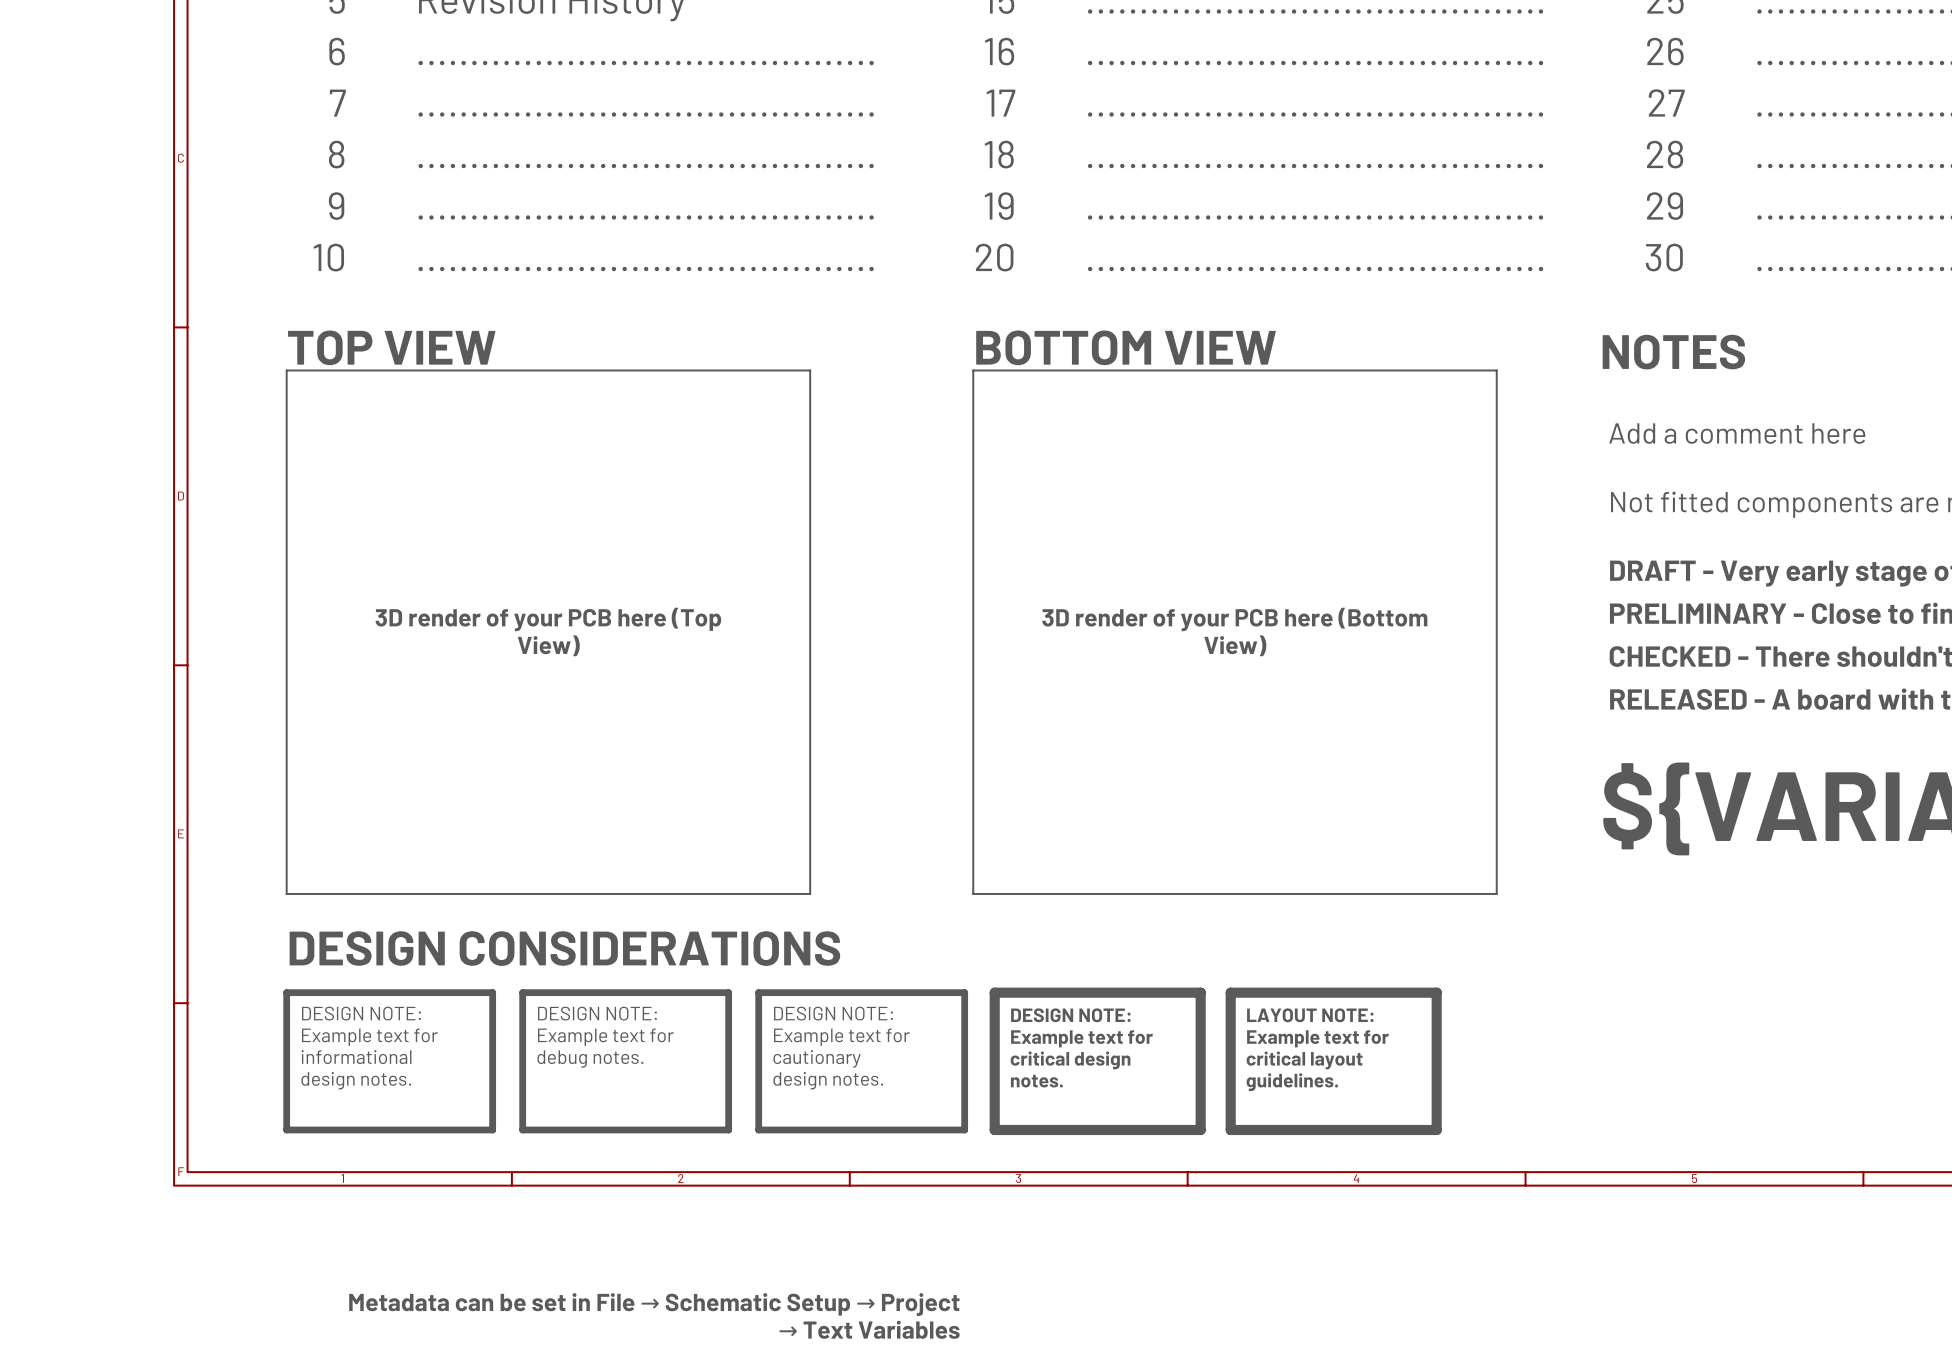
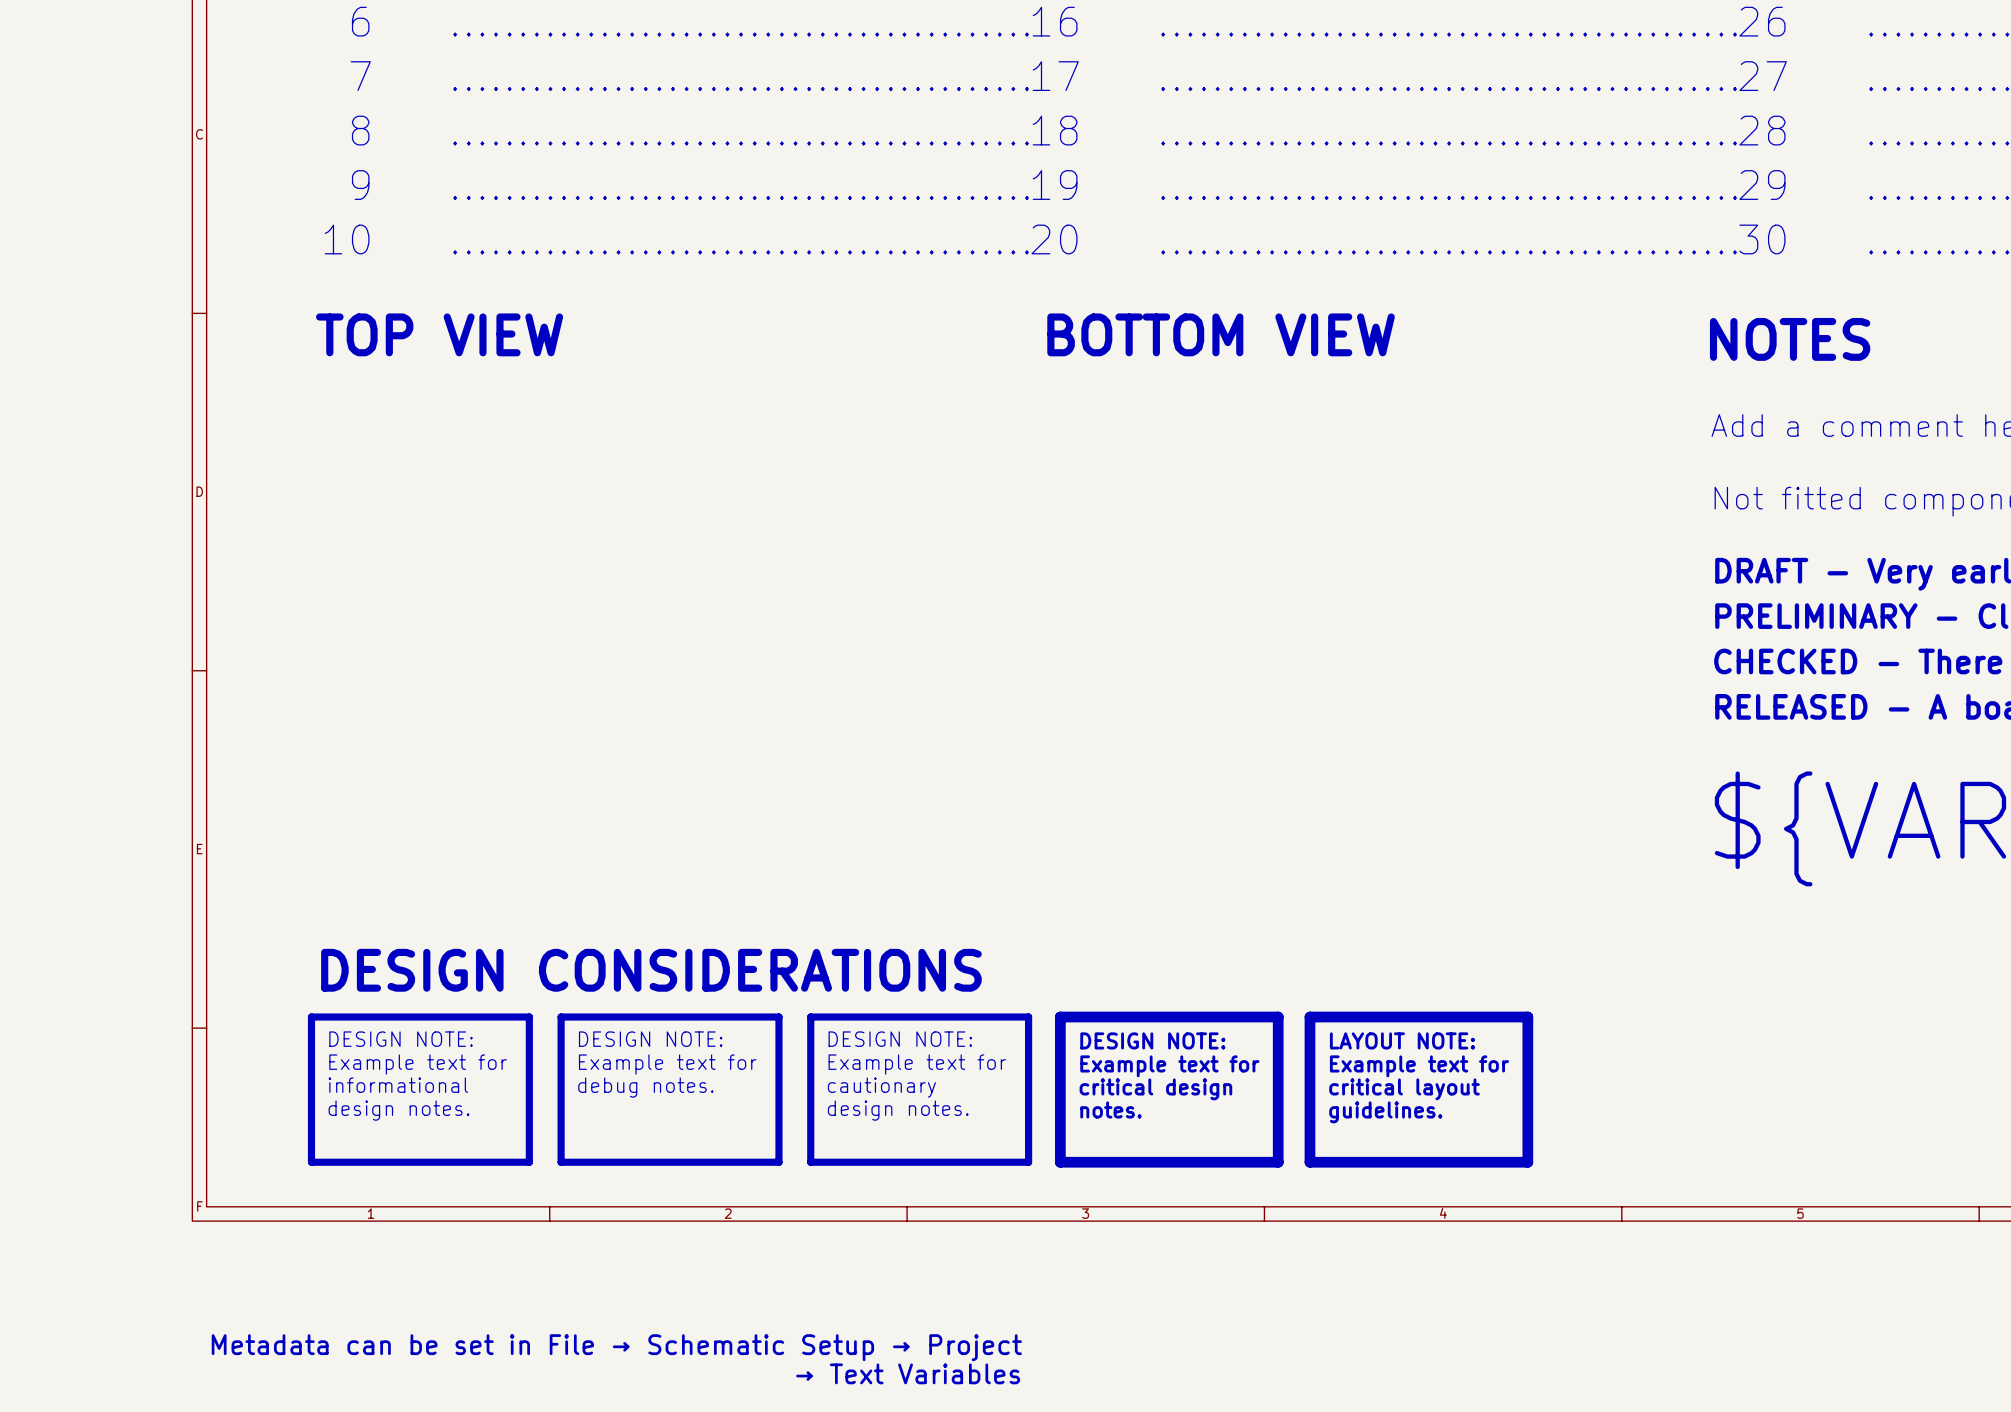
line: (286, 370) (810, 370) (810, 893) (286, 893) (286, 370) -> none
line: (973, 370) (1496, 370) (1496, 893) (973, 893) (973, 370) -> none
text: 3D render of your PCB here (Top (548, 619) -> none
text: 3D render of your PCB here (Bottom (1234, 619) -> none
text: View) (548, 645) -> none
text: View) (1235, 645) -> none

